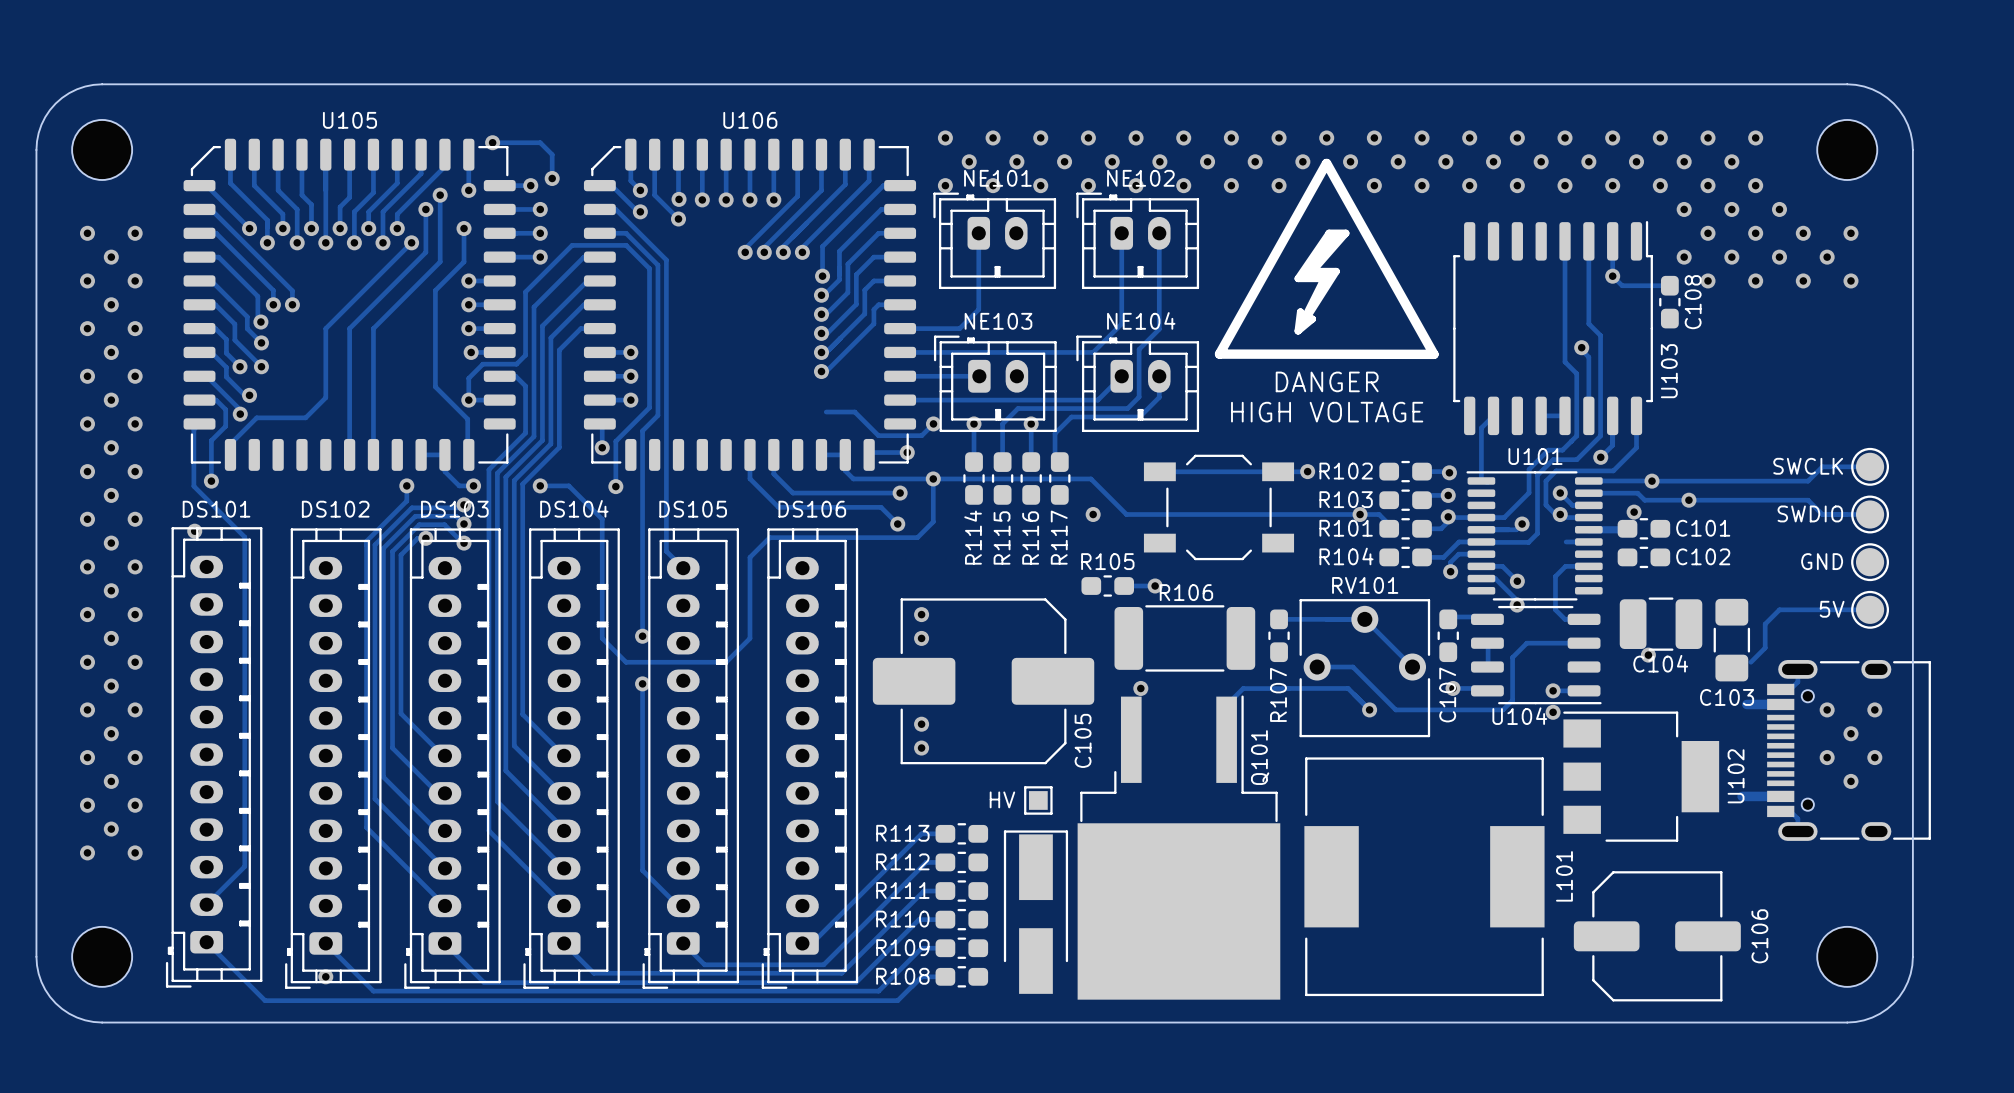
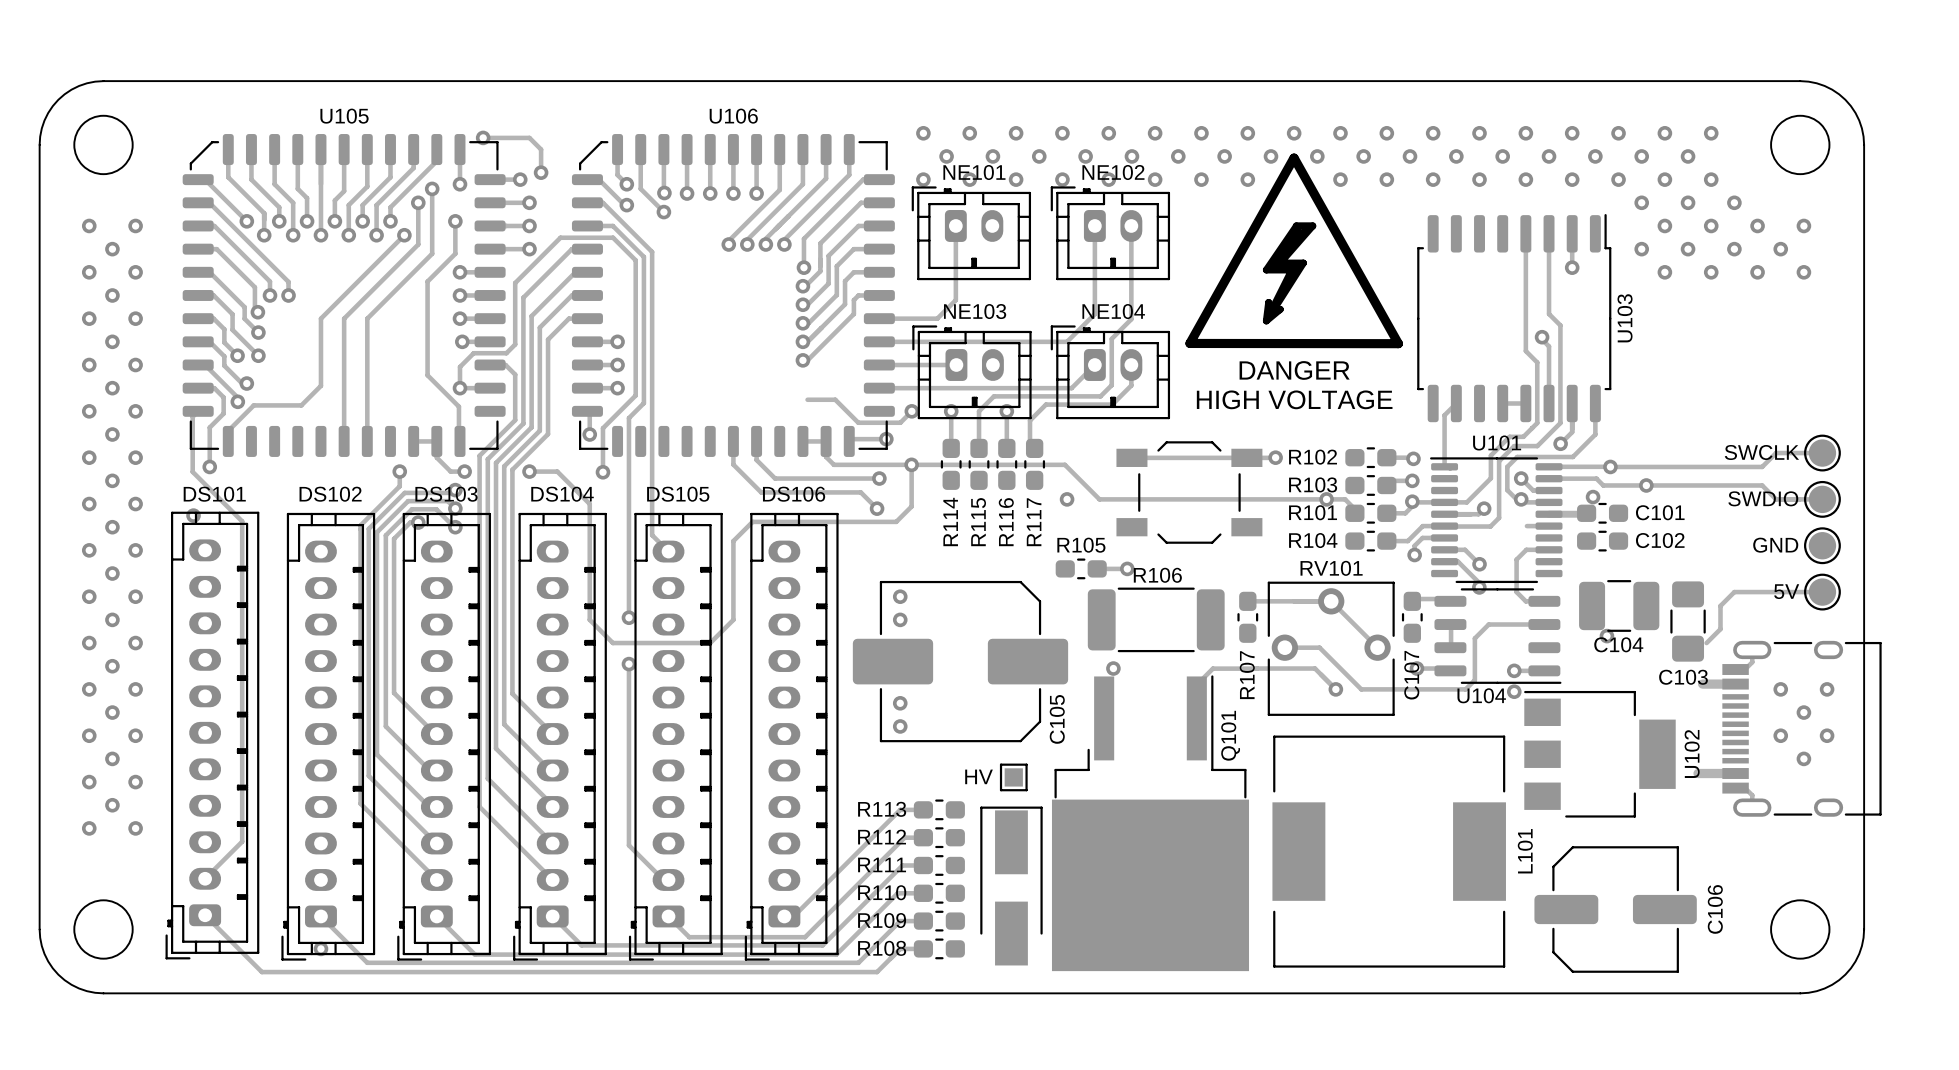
track: (1612, 276) (1622, 285) (1669, 285) -> none
C108: (1669, 302) -> none
U103 name position: U103 (1669, 371) -> U103 (1625, 318)
part footprint: [1767, 660, 1931, 841] -> [1722, 640, 1882, 817]

